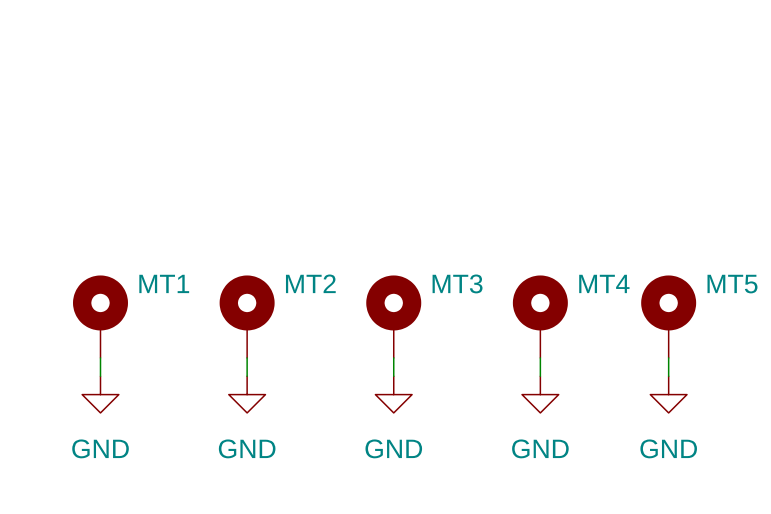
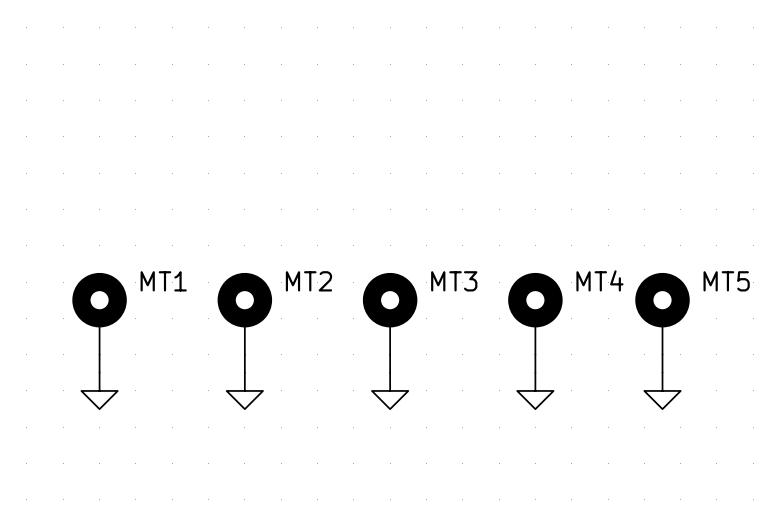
power symbol text: GND (100, 448) -> none
power symbol text: GND (247, 448) -> none
power symbol text: GND (393, 448) -> none
power symbol text: GND (540, 448) -> none
power symbol text: GND (668, 448) -> none

